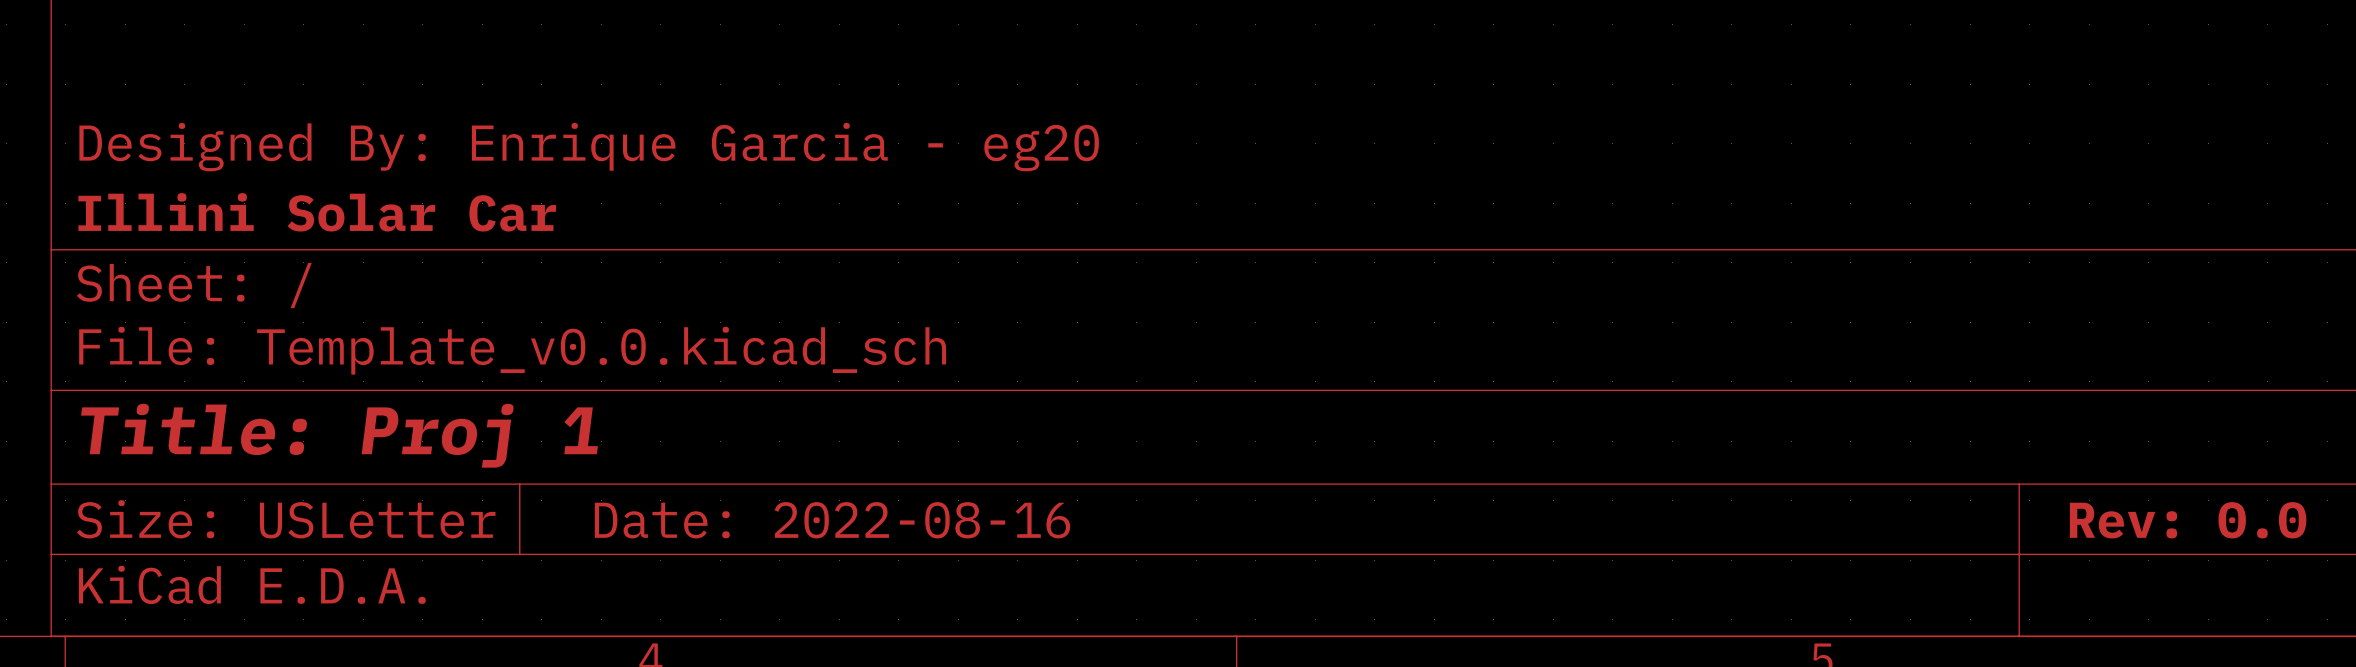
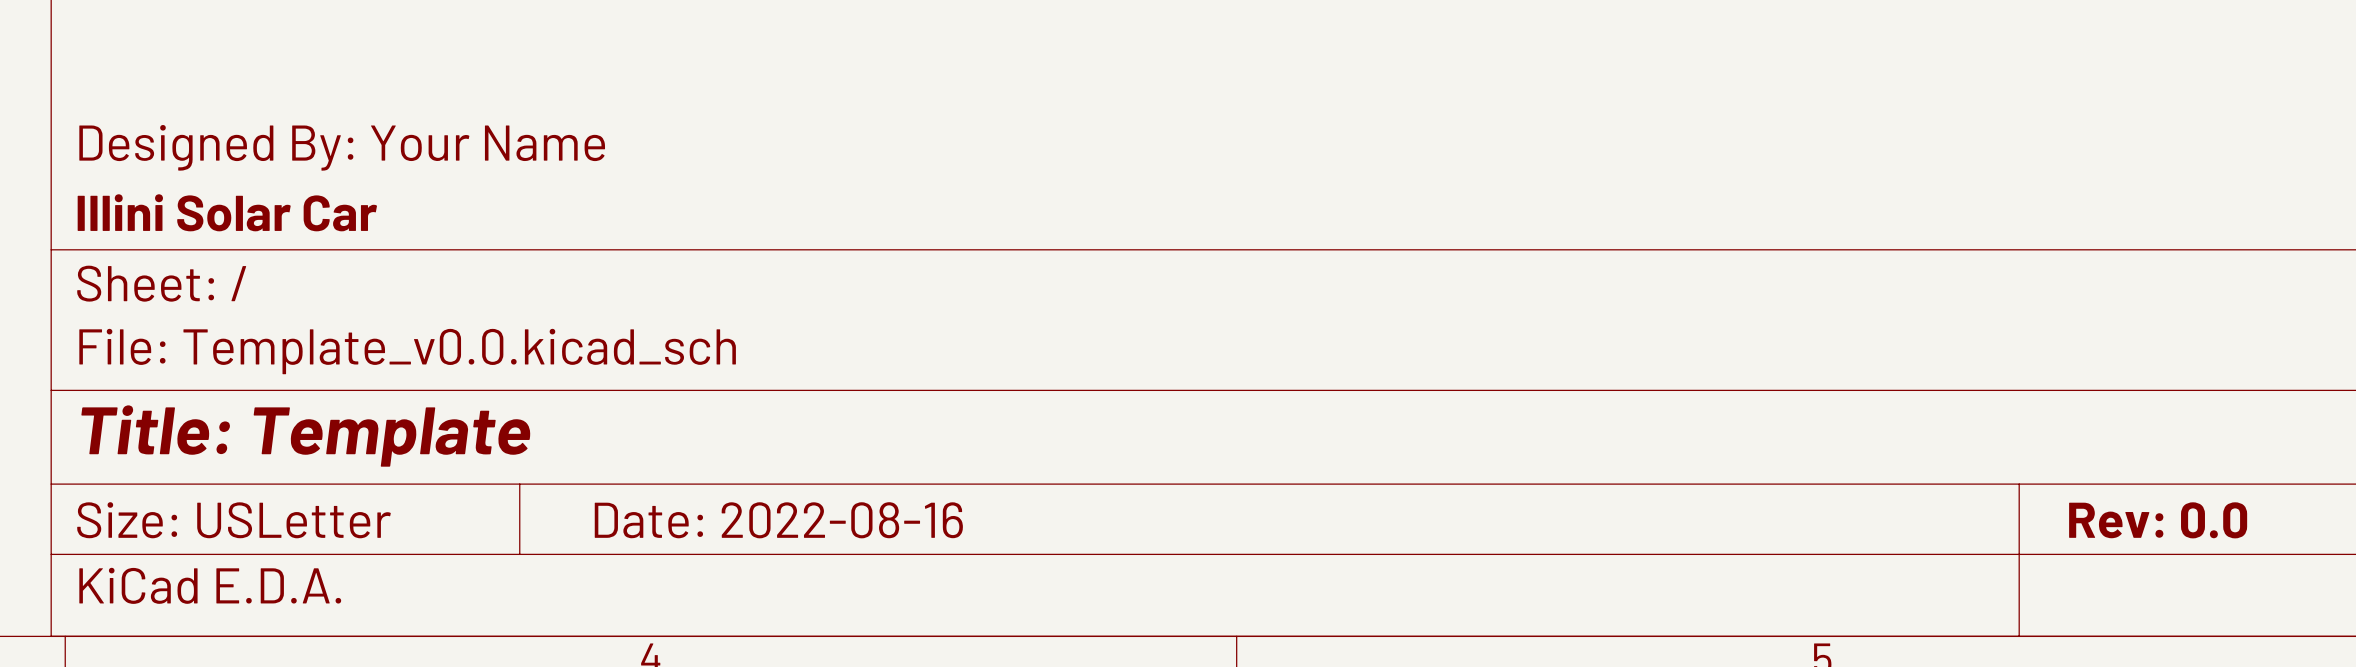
title block: Designed By: Enrique Garcia - eg20 (589, 147) -> Designed By: Your Name (342, 147)
title block: Title: Proj 1 (339, 435) -> Title: Template (305, 436)

